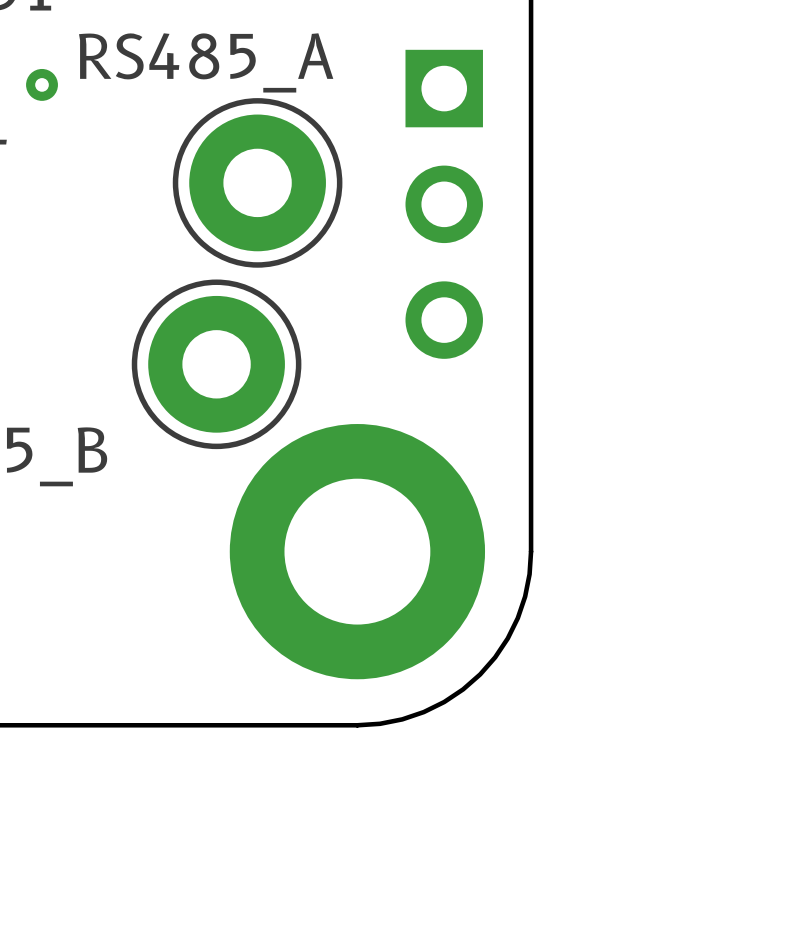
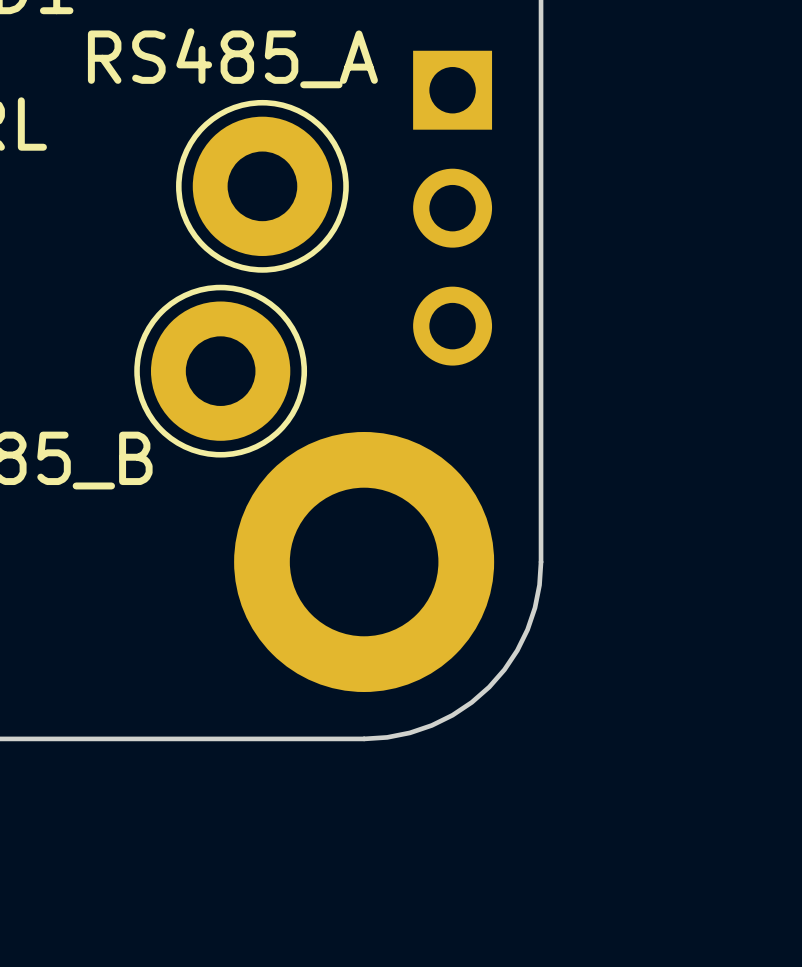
via: (42, 84) -> none

